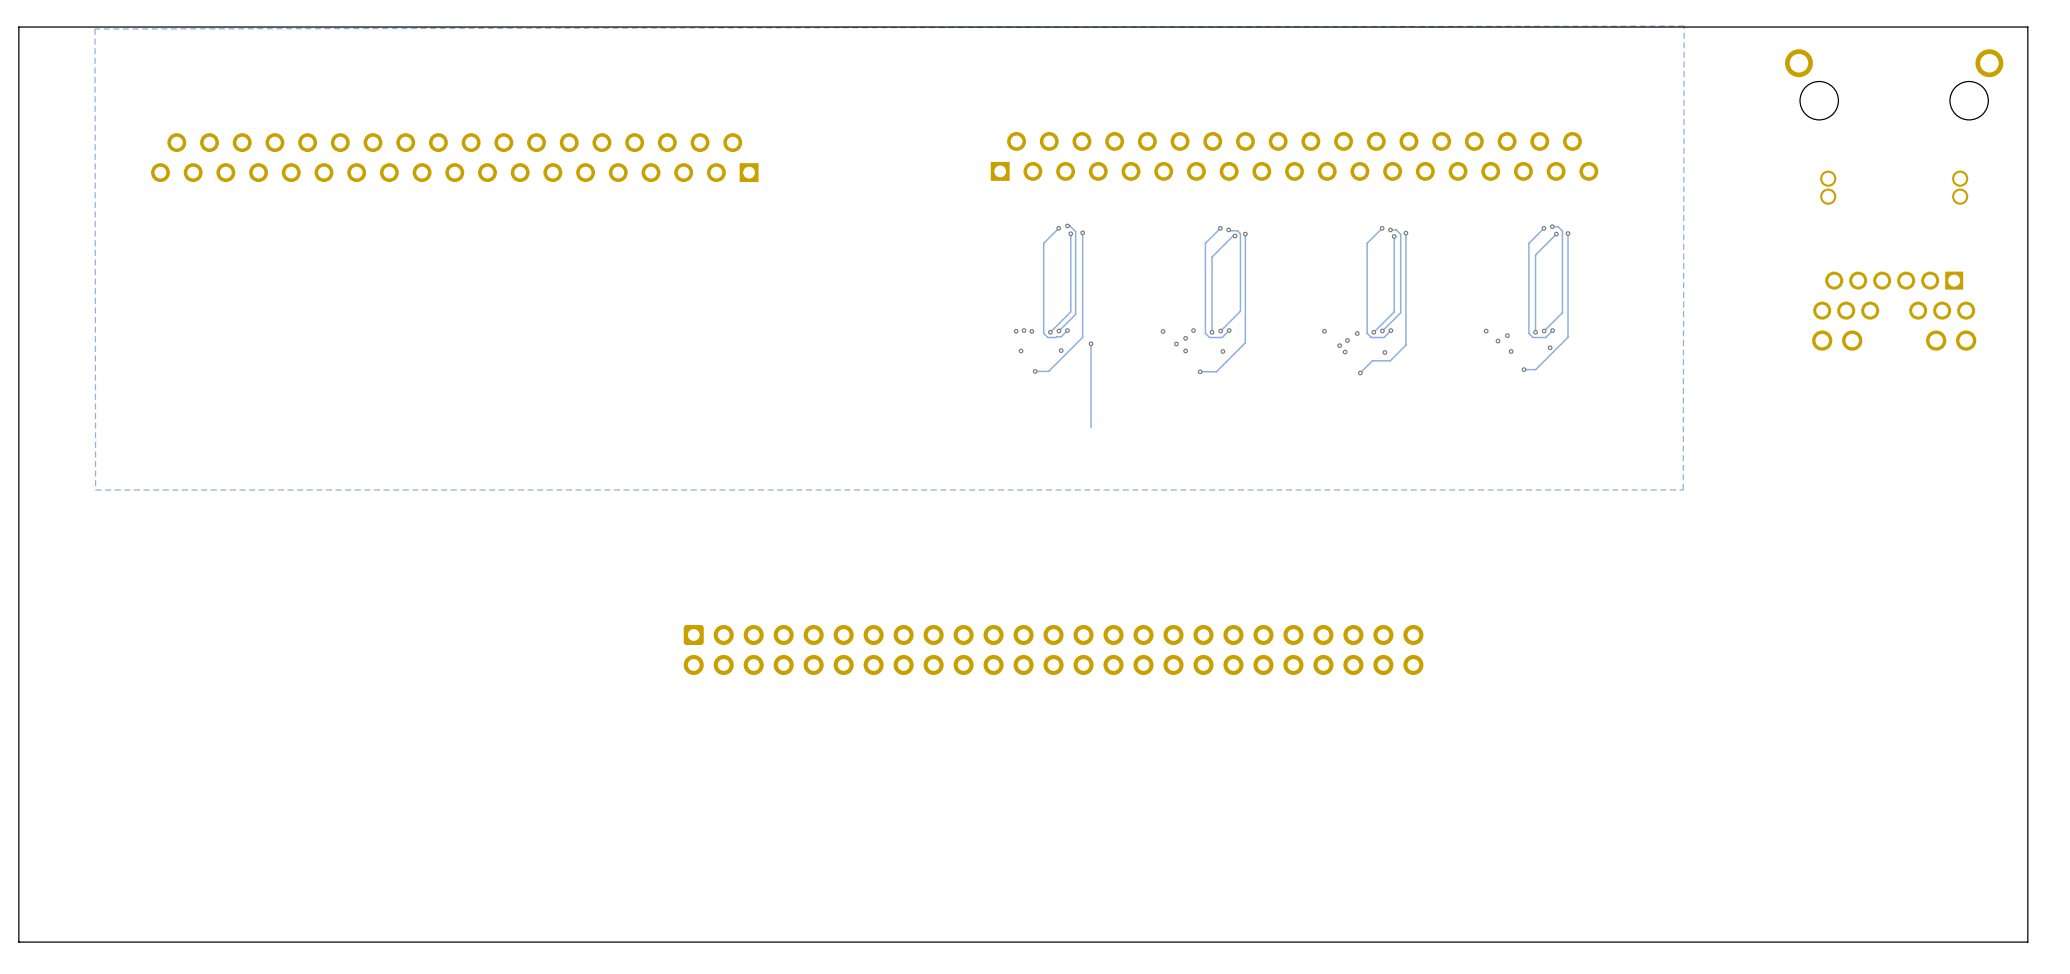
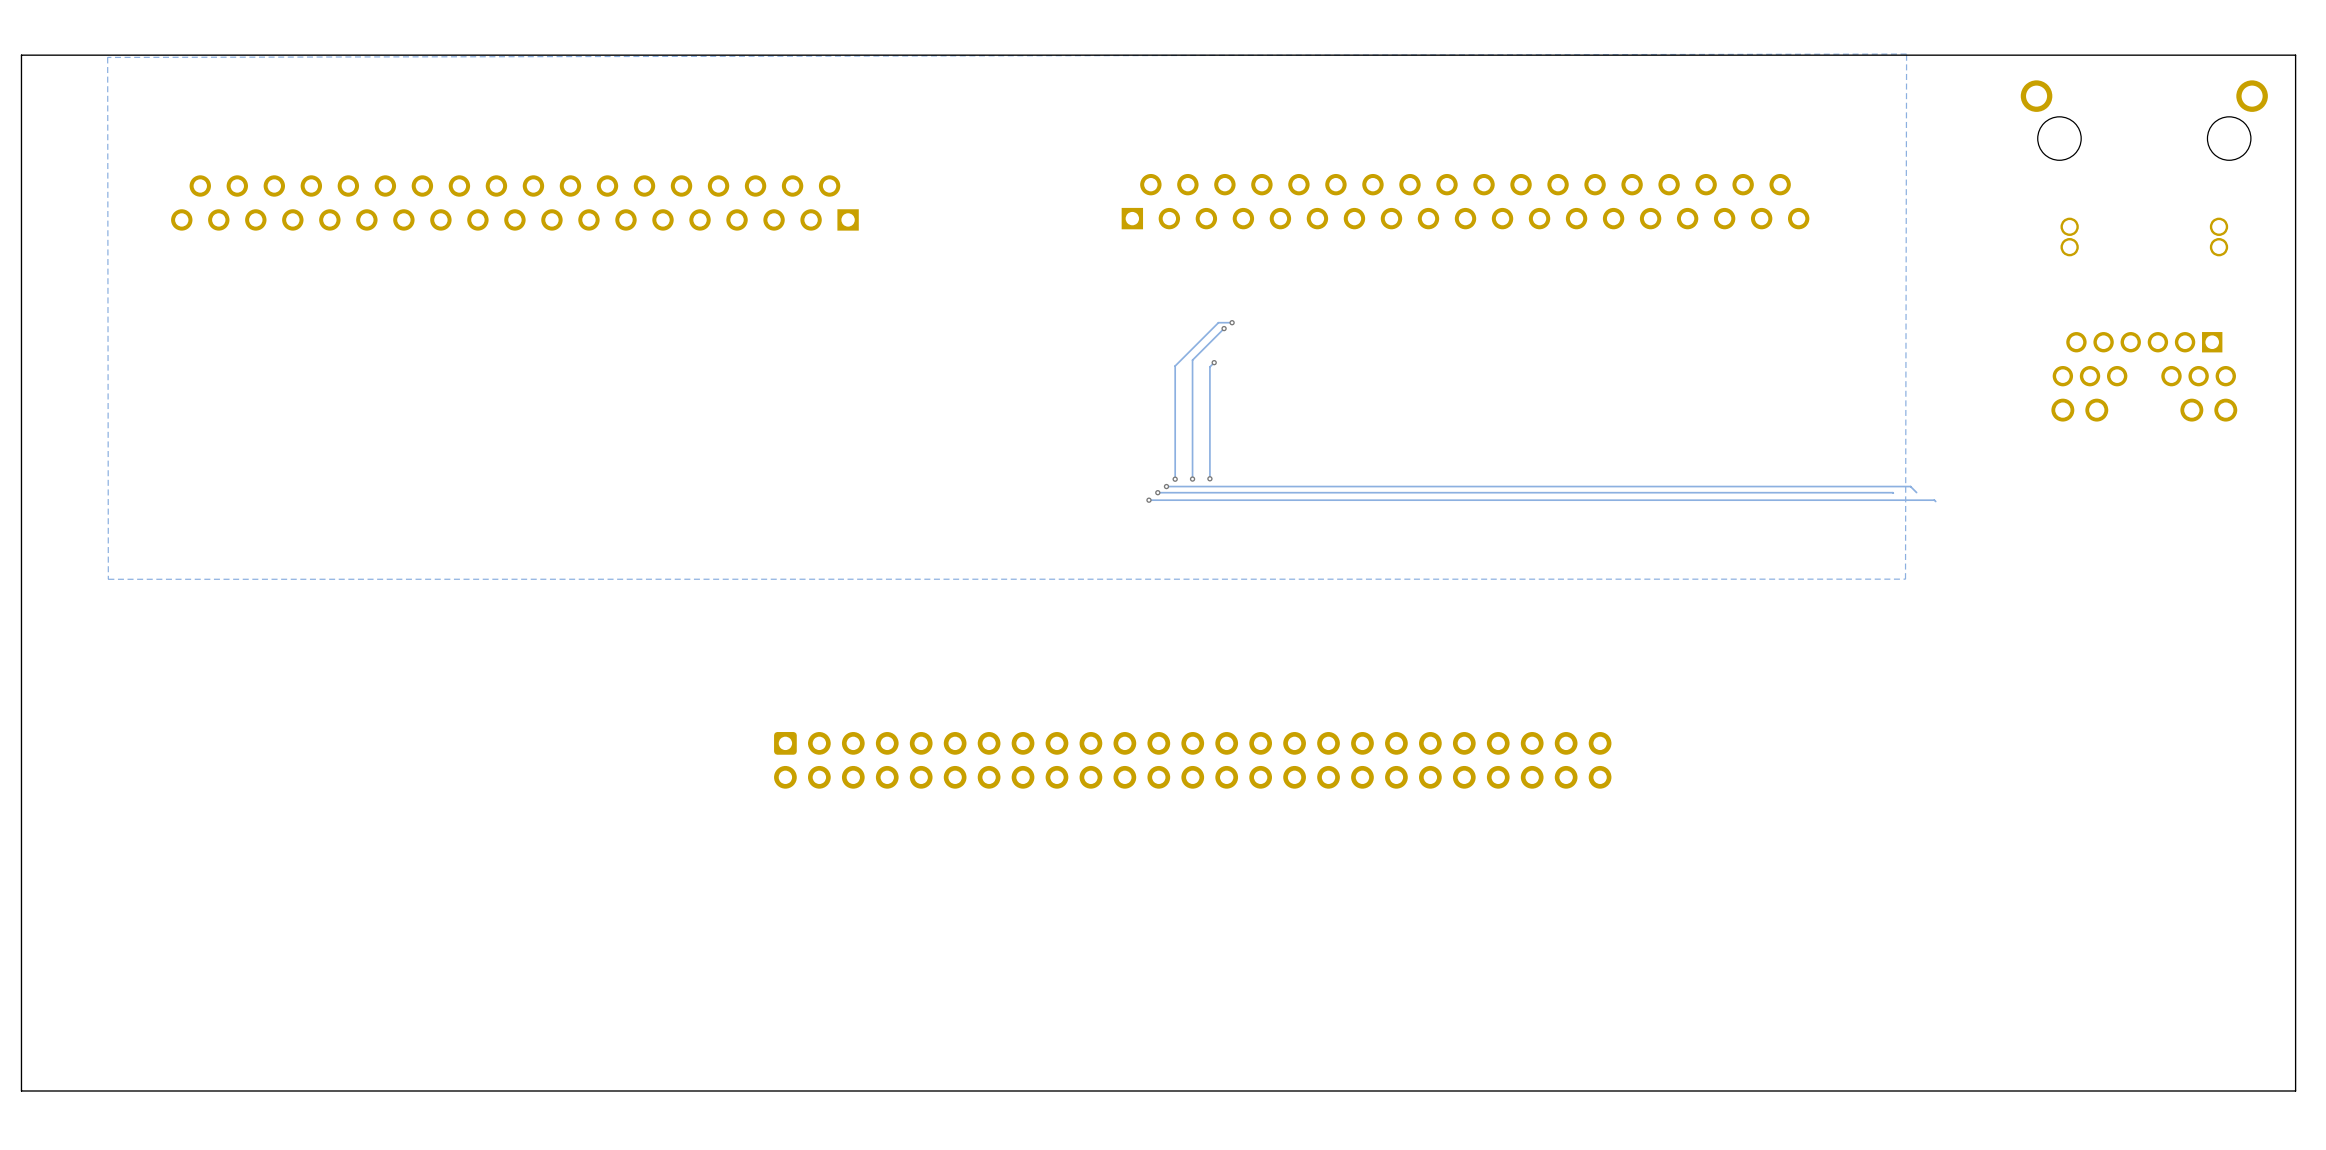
track: (1067, 225) (1075, 231) (1075, 314) (1058, 331) -> none
via: (1067, 225) -> none
track: (1552, 226) (1558, 226) (1562, 231) (1562, 312) (1544, 331) -> none
via: (1552, 226) -> none
track: (1058, 228) (1043, 243) (1043, 333) (1047, 337) (1056, 337) (1061, 336) (1067, 330) -> none
via: (1058, 228) -> none
track: (1220, 228) (1205, 243) (1205, 333) (1209, 337) (1222, 337) (1229, 330) -> none
via: (1220, 228) -> none
track: (1382, 228) (1367, 243) (1367, 333) (1371, 337) (1383, 337) (1390, 330) -> none
via: (1382, 228) -> none
track: (1543, 228) (1528, 243) (1528, 333) (1533, 337) (1545, 337) (1552, 330) -> none
via: (1543, 228) -> none
track: (1228, 229) (1237, 230) (1240, 233) (1240, 311) (1220, 331) -> none
via: (1228, 229) -> none
track: (1390, 229) (1396, 229) (1400, 234) (1400, 312) (1382, 331) -> none
via: (1390, 229) -> none
track: (1082, 232) (1082, 337) (1048, 371) (1035, 371) -> none
via: (1082, 232) -> none
track: (1070, 233) (1070, 311) (1050, 332) -> none
via: (1070, 233) -> none
track: (1405, 233) (1405, 345) (1390, 360) (1372, 360) (1360, 372) -> none
via: (1405, 233) -> none
track: (1568, 233) (1568, 337) (1535, 369) (1523, 369) -> none
via: (1568, 233) -> none
track: (1245, 234) (1245, 342) (1216, 371) (1200, 371) -> none
via: (1245, 234) -> none
track: (1556, 234) (1535, 254) (1535, 332) -> none
via: (1556, 234) -> none
track: (1235, 235) (1212, 257) (1212, 332) -> none
via: (1235, 235) -> none
track: (1394, 236) (1394, 311) (1373, 332) -> none
via: (1394, 236) -> none
track: none -> (1232, 322) (1218, 322) (1175, 366) (1175, 479)
via: none -> (1232, 322)
track: none -> (1224, 328) (1192, 360) (1192, 479)
via: none -> (1224, 328)
track: none -> (1214, 362) (1209, 366) (1209, 478)
via: none -> (1214, 362)
via: (1023, 330) -> none
via: (1067, 330) -> none
via: (1193, 330) -> none
via: (1229, 330) -> none
via: (1390, 330) -> none
via: (1552, 330) -> none
via: (1016, 331) -> none
via: (1031, 331) -> none
via: (1058, 331) -> none
via: (1163, 331) -> none
via: (1220, 331) -> none
via: (1324, 331) -> none
via: (1382, 331) -> none
via: (1486, 331) -> none
via: (1544, 331) -> none
via: (1050, 332) -> none
via: (1212, 332) -> none
via: (1373, 332) -> none
via: (1535, 332) -> none
via: (1357, 333) -> none
via: (1507, 335) -> none
via: (1185, 338) -> none
via: (1347, 340) -> none
via: (1497, 341) -> none
track: (1091, 343) (1091, 427) -> none
via: (1091, 343) -> none
via: (1176, 344) -> none
via: (1339, 345) -> none
via: (1550, 347) -> none
via: (1021, 350) -> none
via: (1061, 350) -> none
via: (1185, 350) -> none
via: (1222, 351) -> none
via: (1511, 351) -> none
via: (1345, 352) -> none
via: (1384, 352) -> none
via: (1523, 369) -> none
via: (1035, 371) -> none
via: (1200, 371) -> none
via: (1360, 372) -> none
via: none -> (1175, 479)
via: none -> (1192, 479)
via: none -> (1209, 478)
track: none -> (1166, 486) (1910, 486) (1916, 492)
via: none -> (1166, 486)
track: none -> (1157, 492) (1893, 493)
via: none -> (1157, 492)
track: none -> (1148, 500) (1935, 501)
via: none -> (1148, 500)

